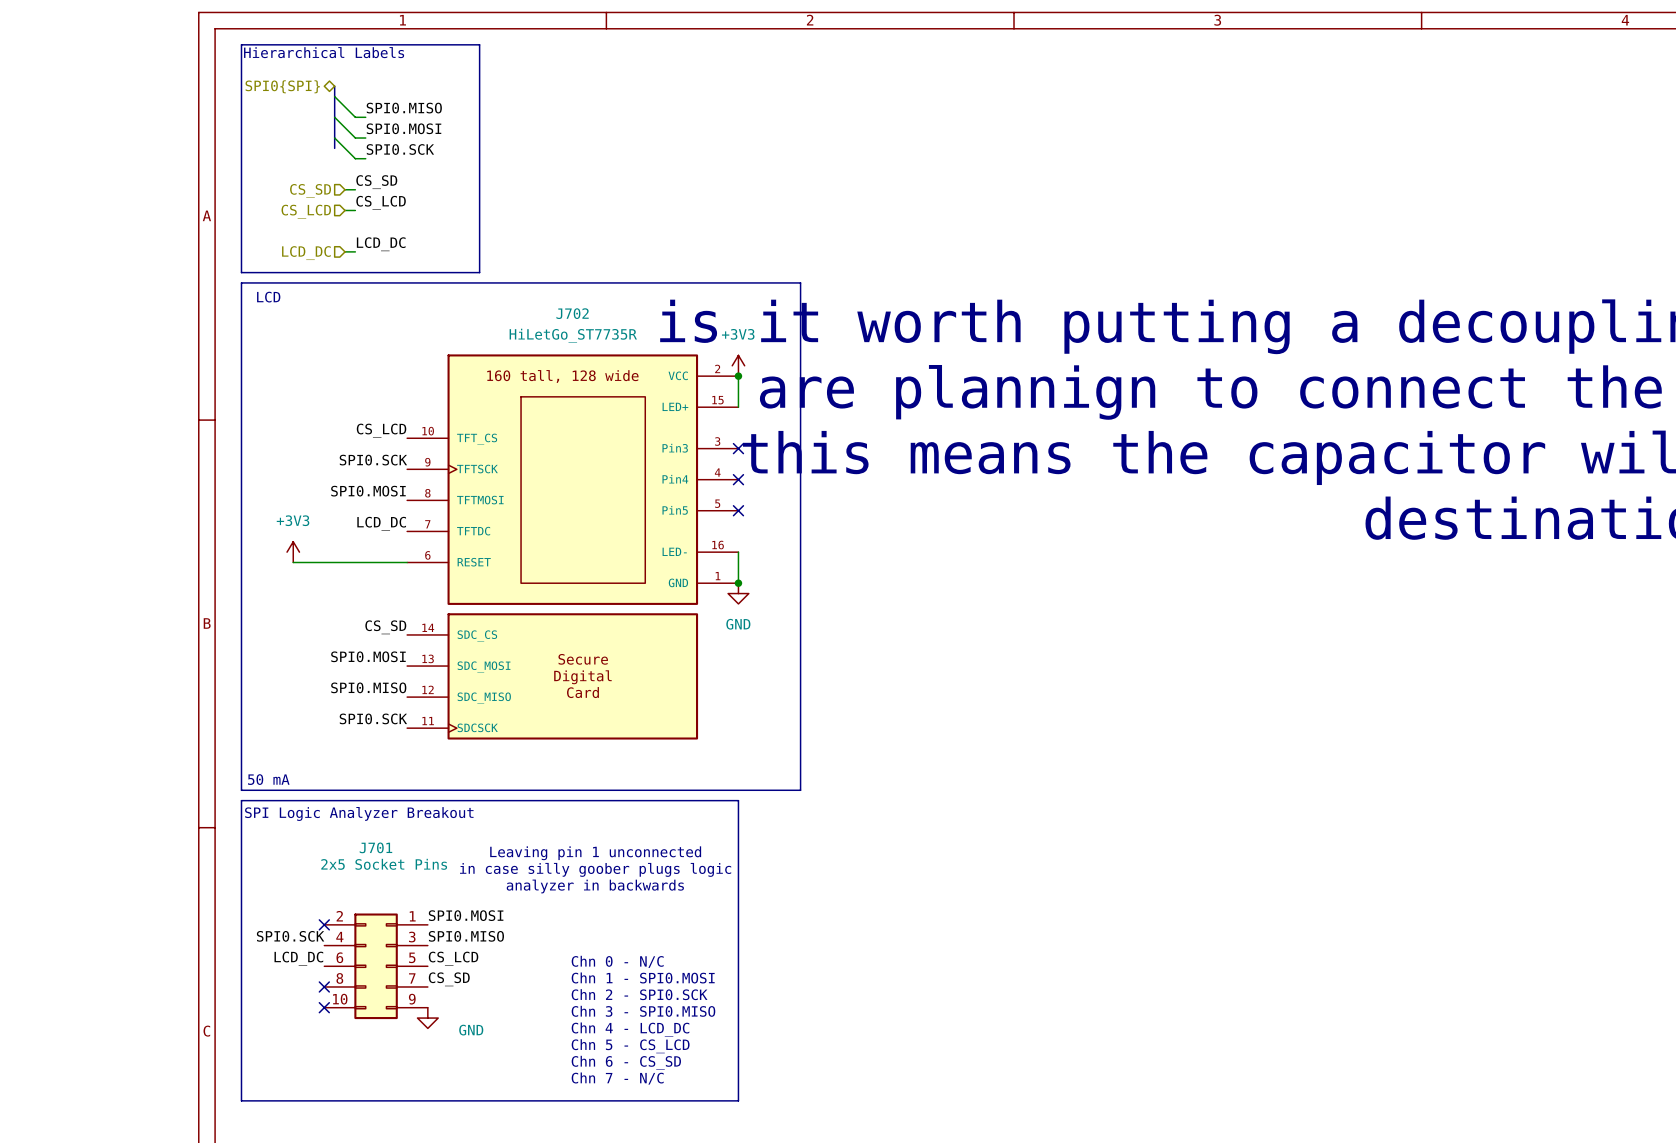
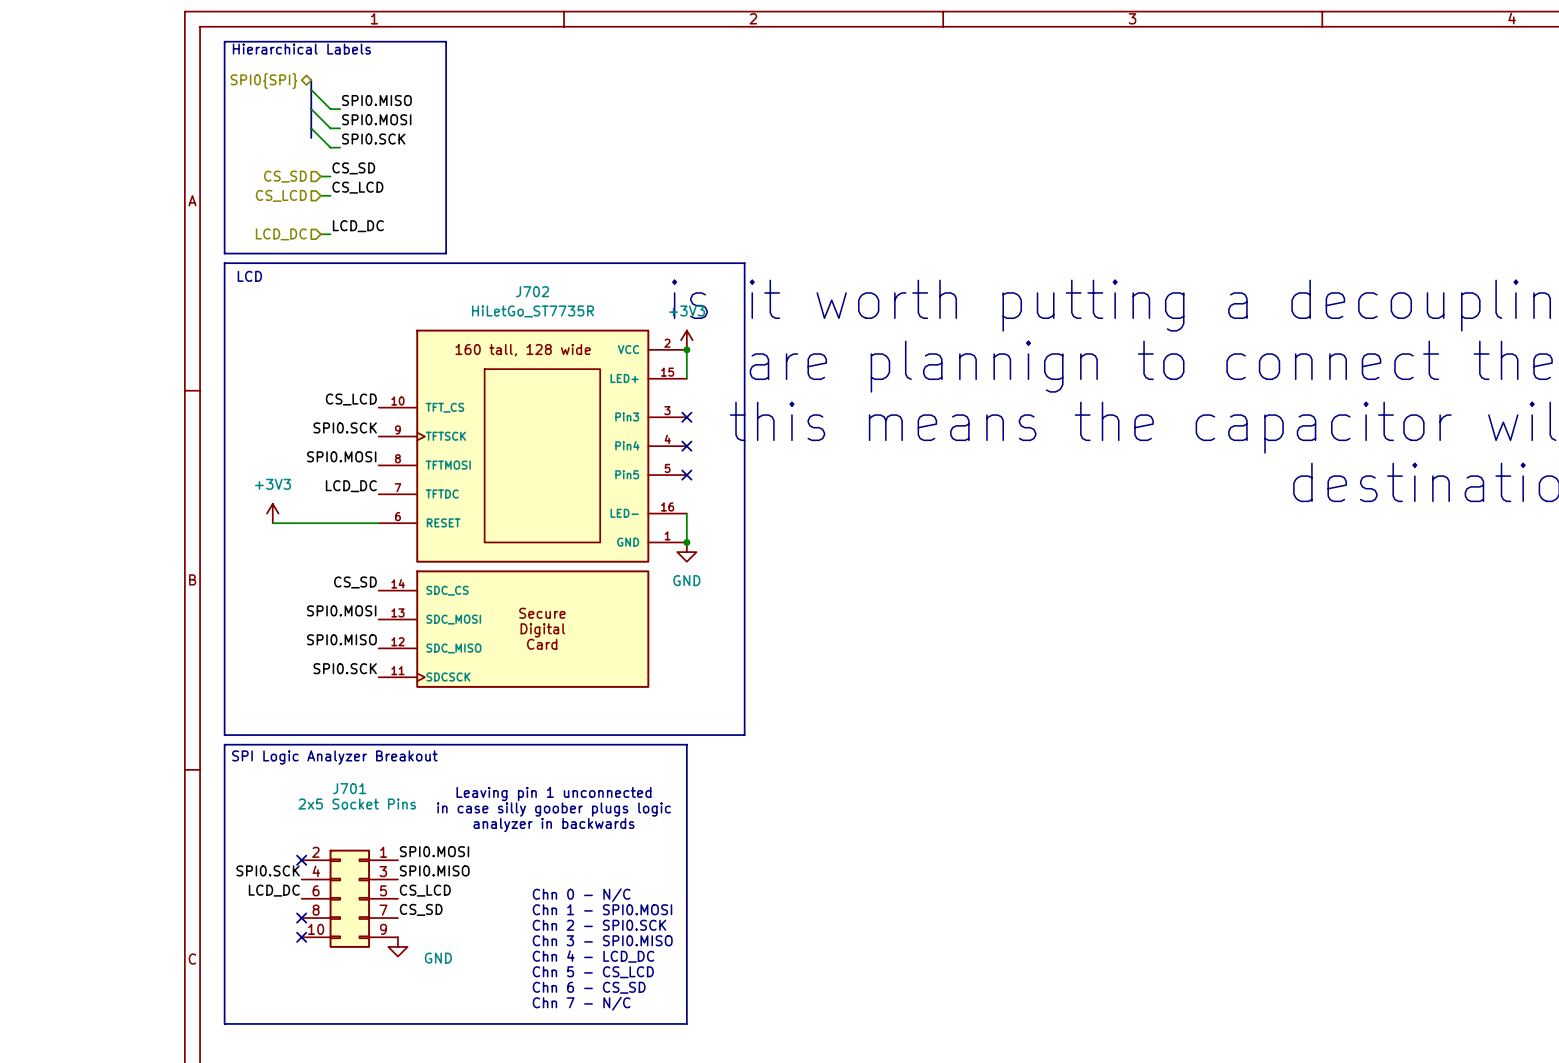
text: 50 mA (268, 779) -> none

